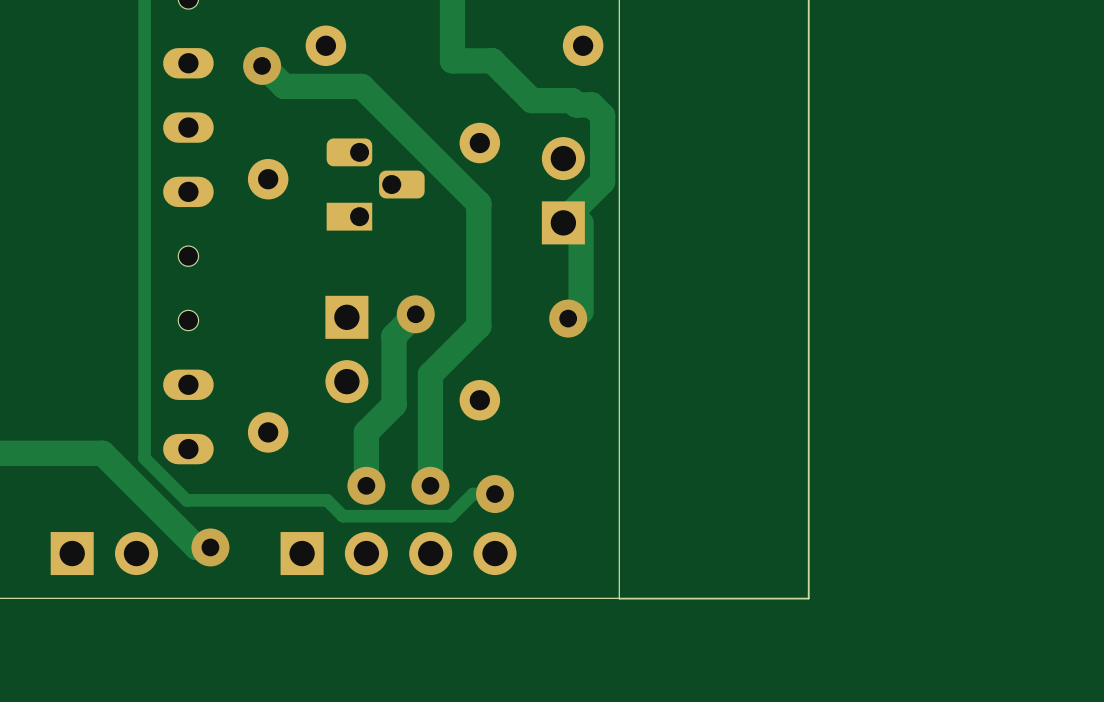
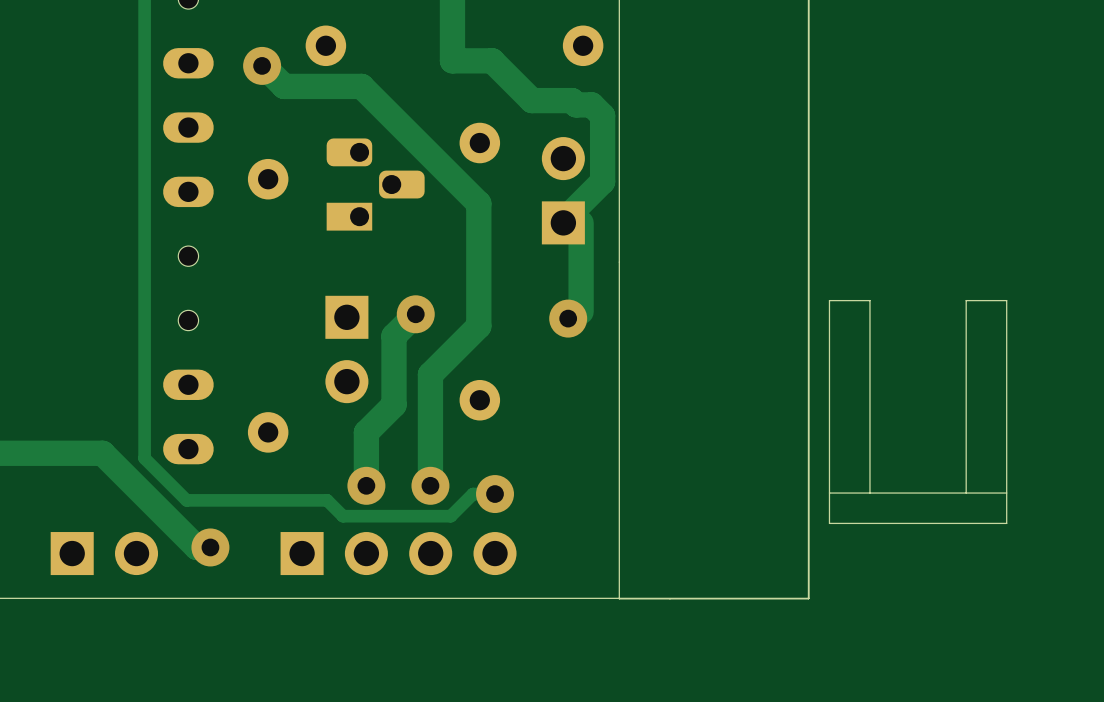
board edge: none -> (966, 493) (966, 300) (1006, 300) (1006, 523) (829, 523) (829, 300) (869, 300) (869, 493)
board edge: none -> (1006, 493) (829, 493)

